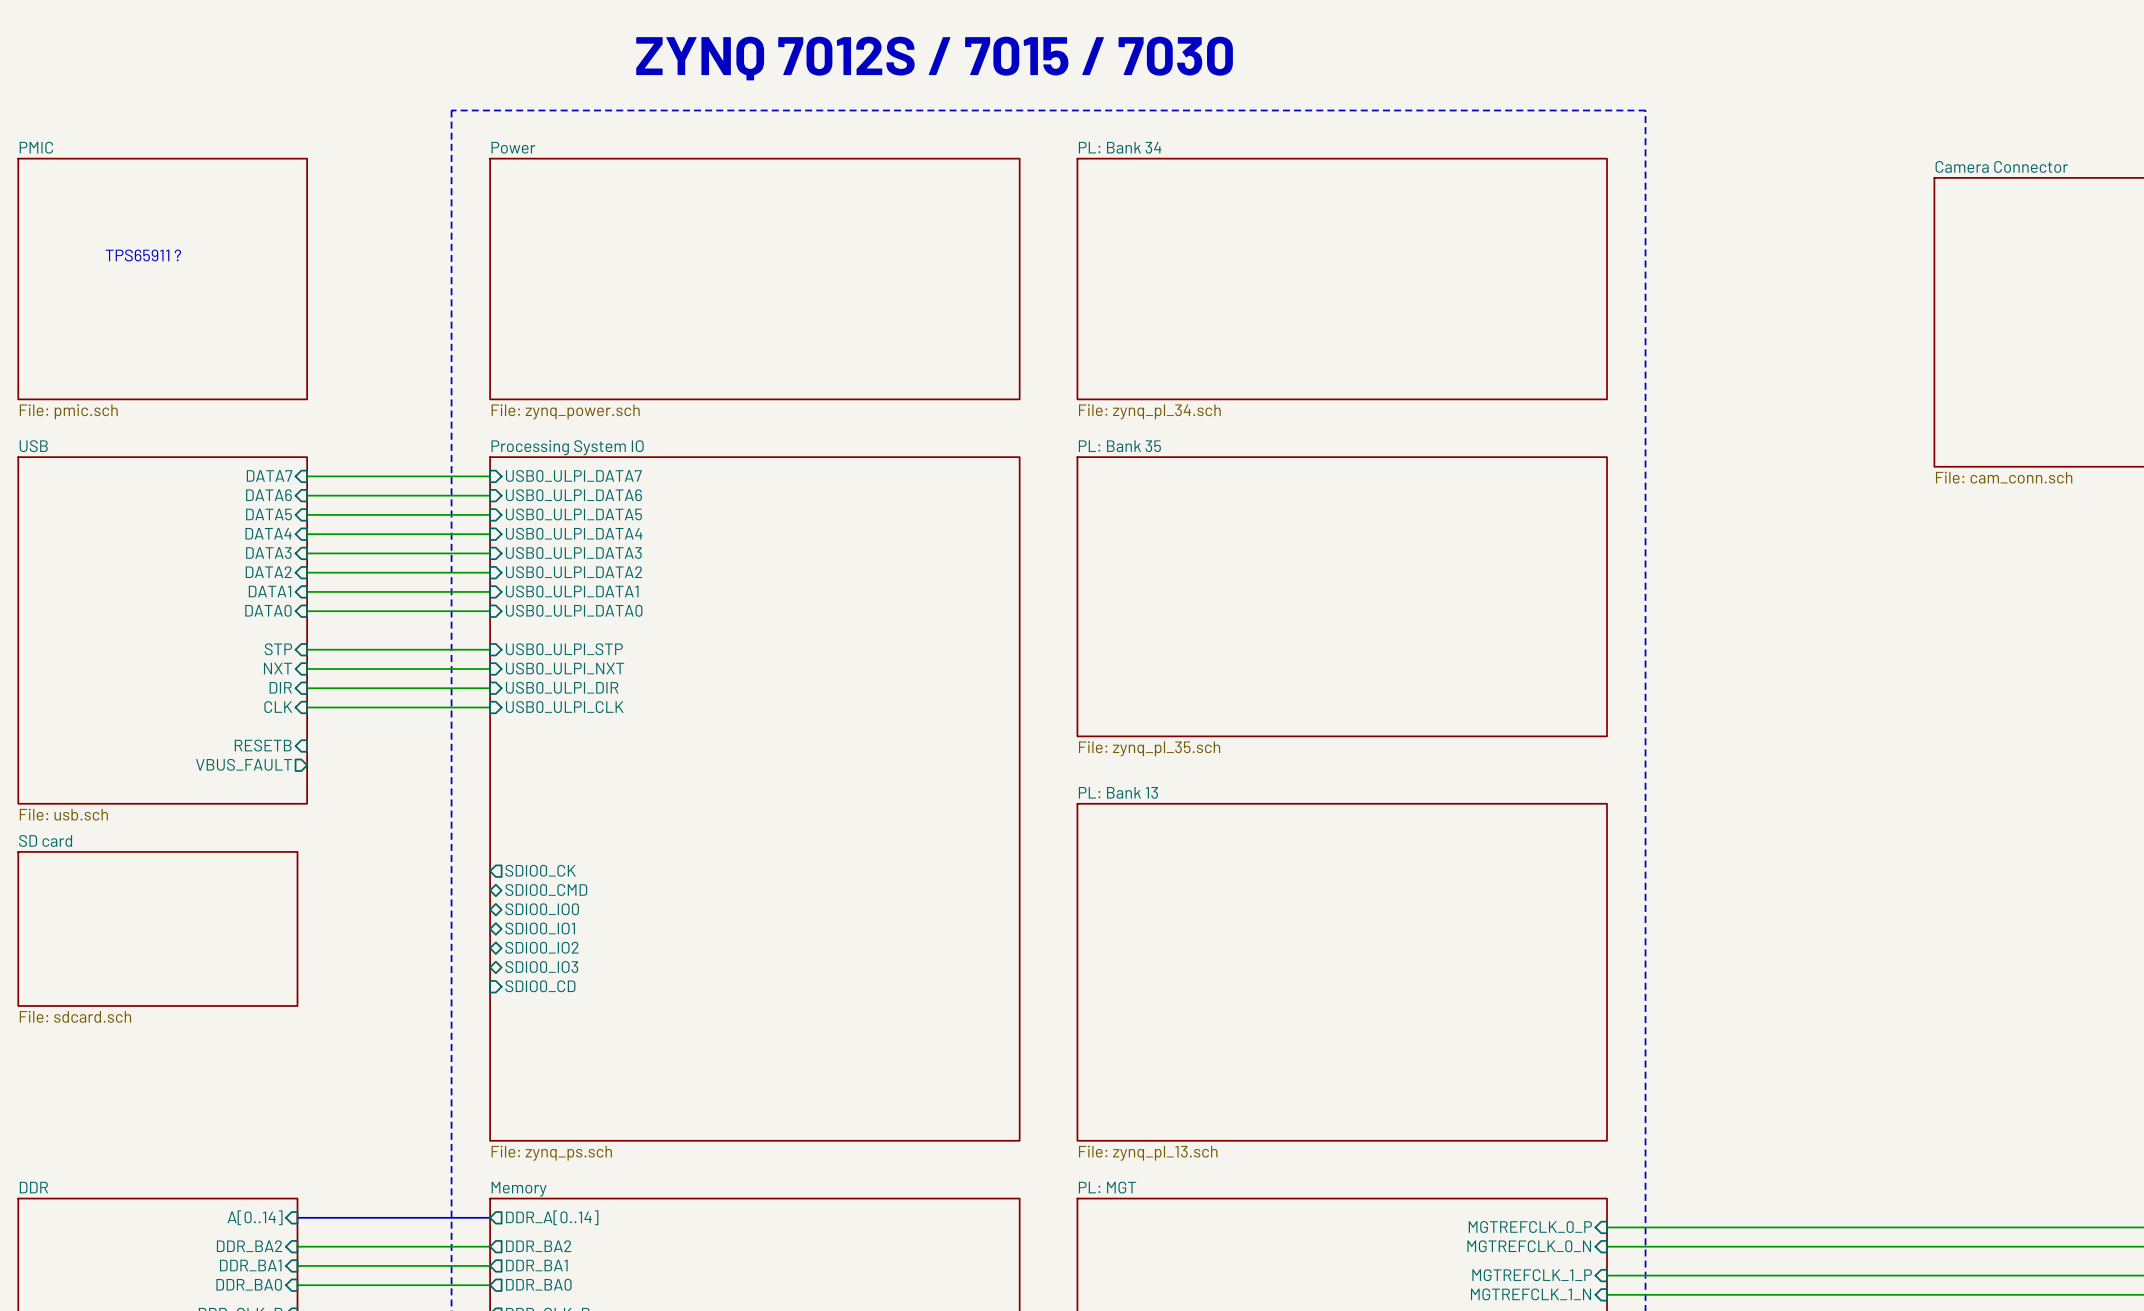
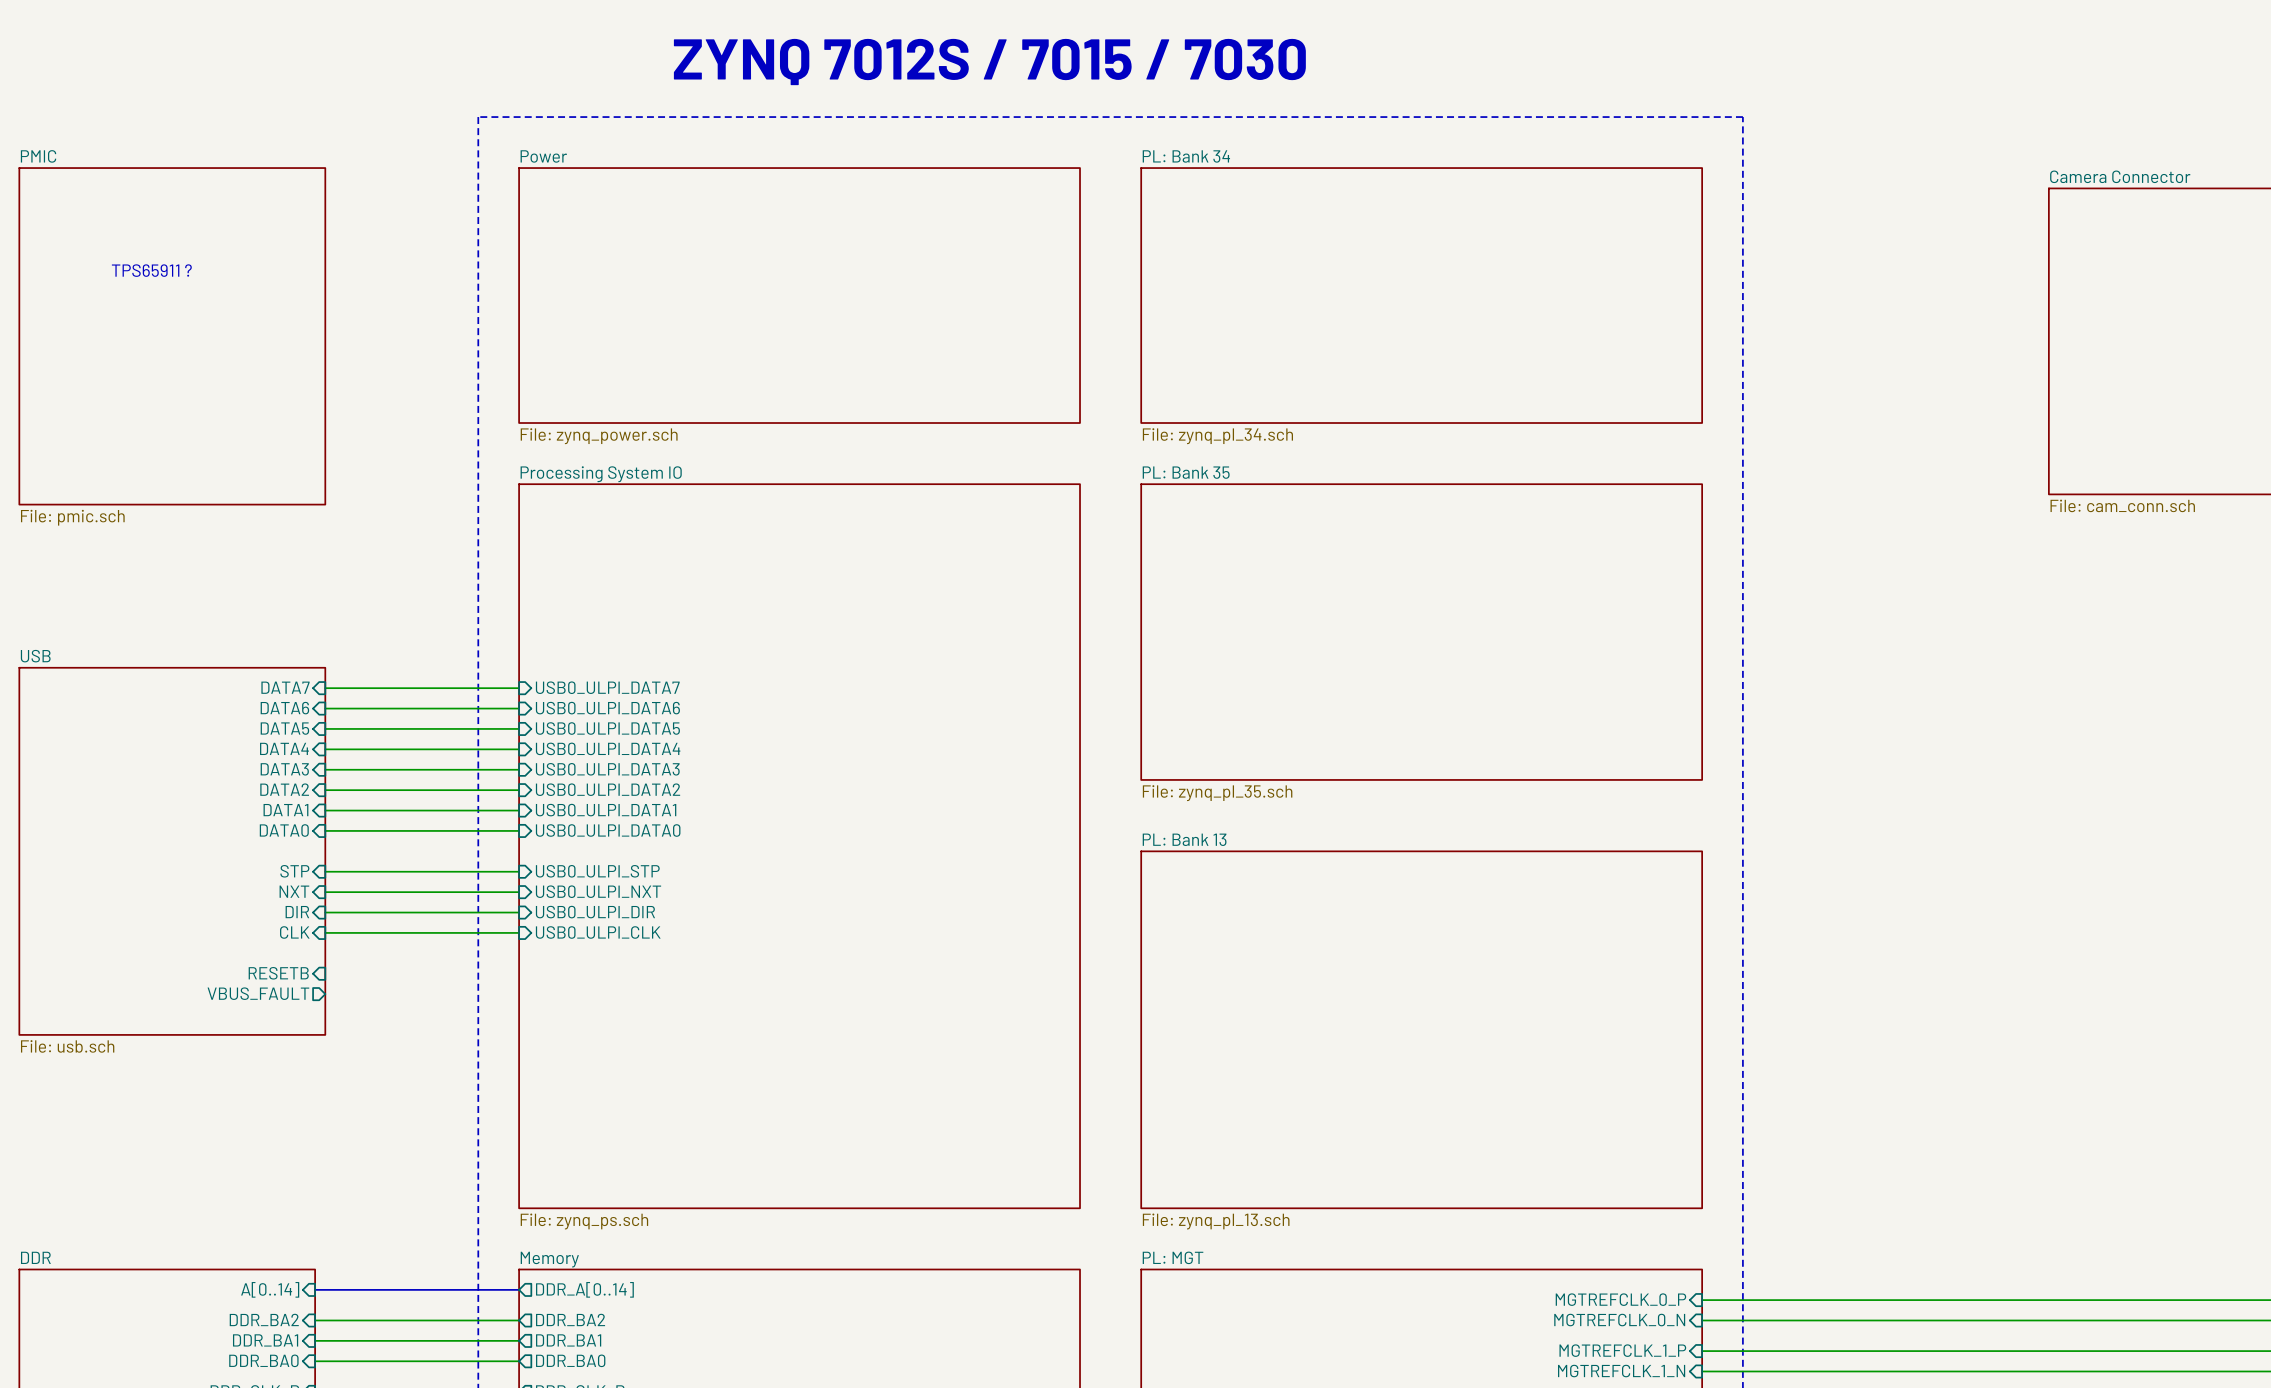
sheet PMIC: File: pmic.sch (162, 279) -> none
sheet PMIC: none -> File: pmic.sch (172, 336)
sheet pin: DATA7 (269, 475) -> none
sheet pin: USB0_ULPI_DATA7 (573, 475) -> none
wire: (307, 476) (490, 476) -> none
sheet pin: DATA6 (268, 495) -> none
wire: (307, 495) (490, 495) -> none
sheet pin: USB0_ULPI_DATA6 (573, 495) -> none
sheet pin: DATA5 (268, 514) -> none
wire: (307, 514) (490, 514) -> none
sheet pin: USB0_ULPI_DATA5 (573, 514) -> none
sheet pin: DATA4 (268, 533) -> none
sheet pin: USB0_ULPI_DATA4 (574, 533) -> none
wire: (307, 534) (490, 534) -> none
sheet pin position: DATA3 (268, 553) -> DATA3 (284, 769)
wire: (307, 553) (490, 553) -> (325, 769) (519, 769)
sheet pin position: USB0_ULPI_DATA3 (573, 553) -> USB0_ULPI_DATA3 (607, 769)
sheet pin: DATA2 (268, 572) -> none
wire: (307, 572) (490, 572) -> (325, 790) (519, 790)
sheet pin position: USB0_ULPI_DATA2 (574, 572) -> USB0_ULPI_DATA2 (608, 789)
sheet pin: DATA1 (269, 591) -> none
wire: (307, 591) (490, 591) -> (325, 810) (519, 810)
sheet pin position: USB0_ULPI_DATA1 (572, 591) -> USB0_ULPI_DATA1 (606, 810)
sheet pin position: DATA0 (268, 610) -> DATA0 (284, 830)
sheet pin position: USB0_ULPI_DATA0 (574, 610) -> USB0_ULPI_DATA0 (608, 830)
wire: (307, 611) (490, 611) -> (325, 830) (519, 830)
sheet USB position: (162, 630) -> (172, 851)
sheet pin: STP (278, 649) -> DATA7 (285, 687)
sheet pin: USB0_ULPI_STP (564, 649) -> USB0_ULPI_DATA7 (607, 687)
sheet pin: NXT (277, 668) -> DATA6 (284, 708)
sheet pin: USB0_ULPI_NXT (565, 668) -> USB0_ULPI_DATA6 (607, 708)
sheet pin: DIR (280, 687) -> DATA5 (284, 728)
sheet pin: USB0_ULPI_DIR (562, 687) -> USB0_ULPI_DATA5 (607, 728)
sheet pin: CLK (278, 707) -> DATA4 (284, 748)
sheet pin: USB0_ULPI_CLK (564, 707) -> USB0_ULPI_DATA4 (608, 748)
sheet pin: RESETB (263, 745) -> DATA2 (284, 789)
sheet pin shape: output (243, 764) -> input (285, 810)
sheet pin: VBUS_FAULT (243, 764) -> DATA1 (285, 810)
sheet pin: none -> STP (294, 871)
sheet pin: none -> USB0_ULPI_STP (597, 871)
wire: none -> (325, 871) (519, 871)
sheet pin: none -> NXT (294, 891)
sheet pin: none -> USB0_ULPI_NXT (598, 891)
wire: none -> (325, 892) (519, 892)
sheet pin: none -> DIR (297, 912)
wire: none -> (325, 912) (519, 912)
sheet pin: none -> USB0_ULPI_DIR (595, 912)
sheet pin: SDIO0_CK (540, 870) -> none
sheet pin: none -> CLK (294, 932)
wire: none -> (325, 932) (519, 932)
sheet pin: none -> USB0_ULPI_CLK (598, 932)
sheet pin: SDIO0_CMD (546, 890) -> none
sheet pin: SDIO0_IO0 (542, 909) -> none
sheet pin: none -> RESETB (278, 973)
sheet SD card: File: sdcard.sch (157, 928) -> none
sheet pin: SDIO0_IO1 (540, 928) -> none
sheet pin: none -> VBUS_FAULT (258, 993)
sheet pin: SDIO0_IO2 (542, 947) -> none
sheet pin: SDIO0_IO3 (541, 967) -> none
sheet pin: SDIO0_CD (540, 986) -> none

